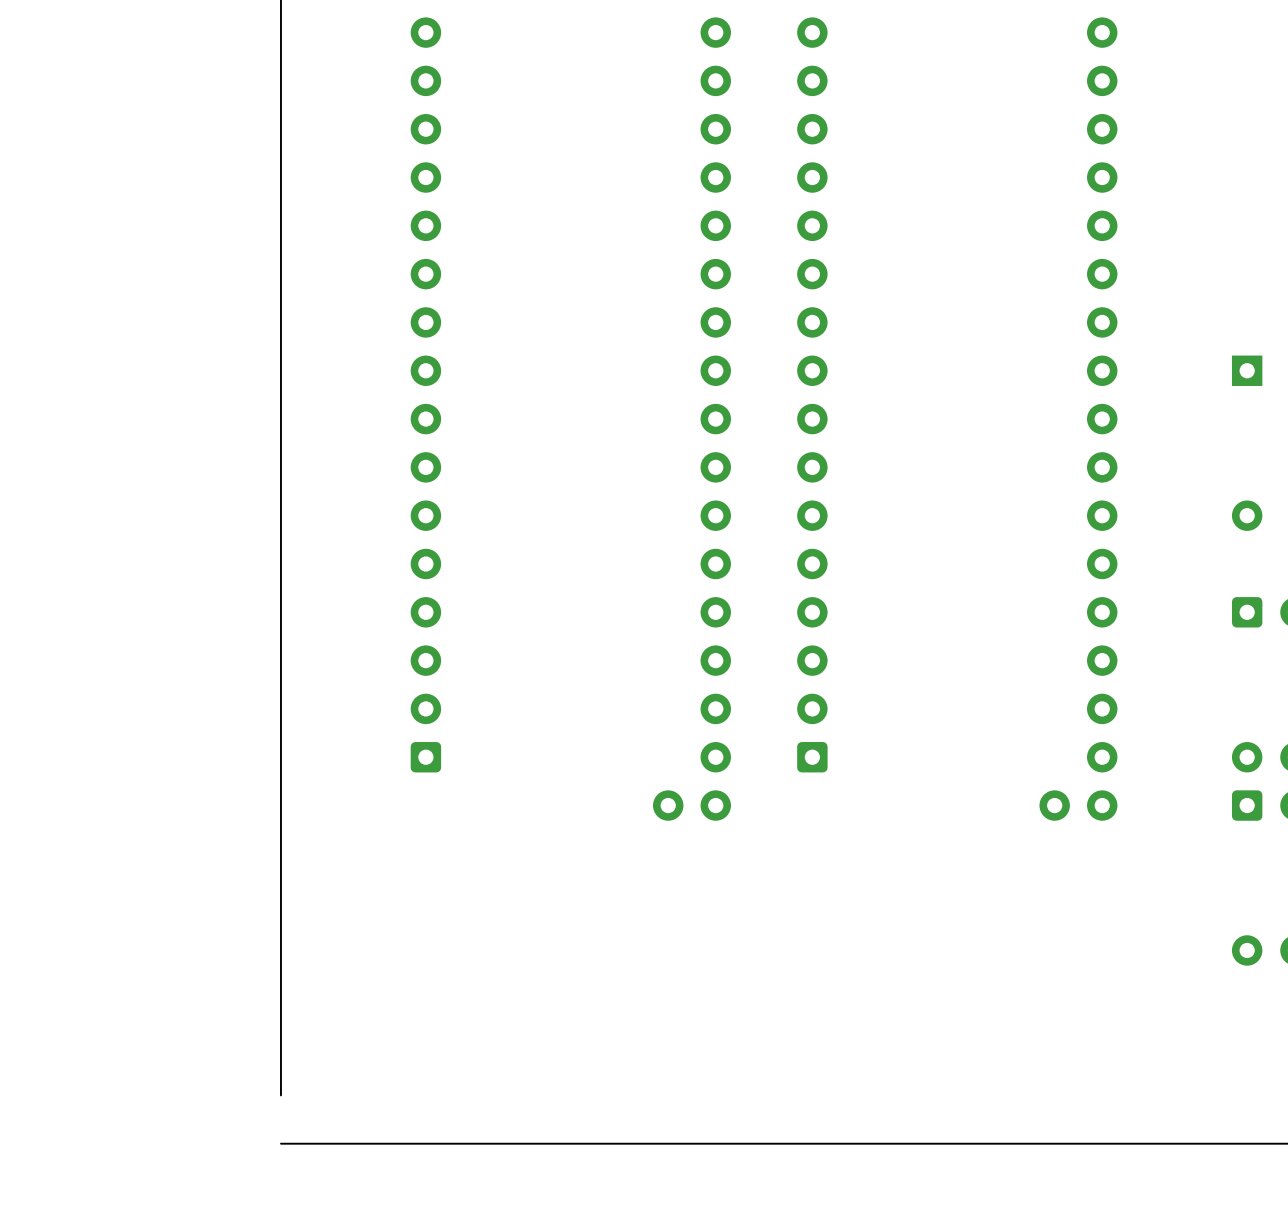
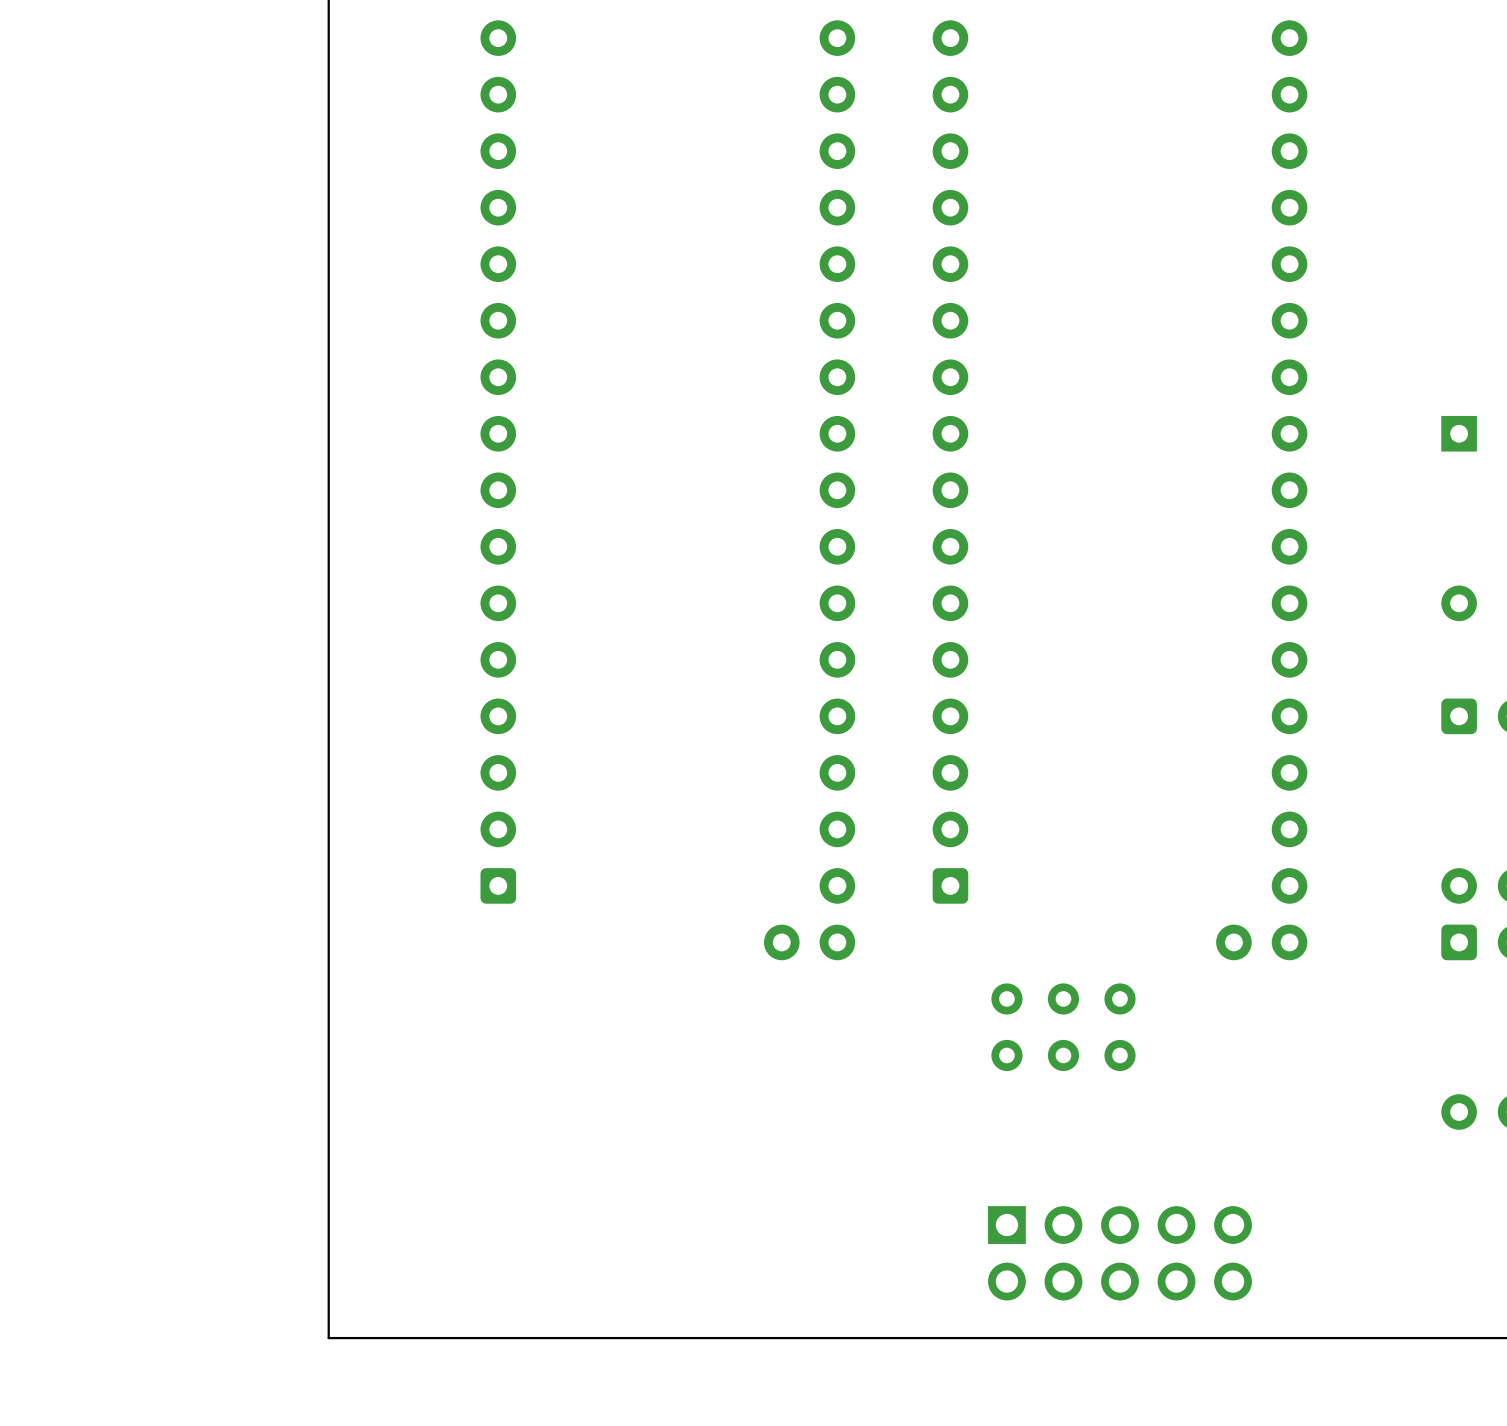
part: none -> (1006, 1027)
part: none -> (1063, 1027)
part: none -> (1119, 1027)
part: none -> (1119, 1253)
board edge: none -> (328, 1281) (328, 1338)

